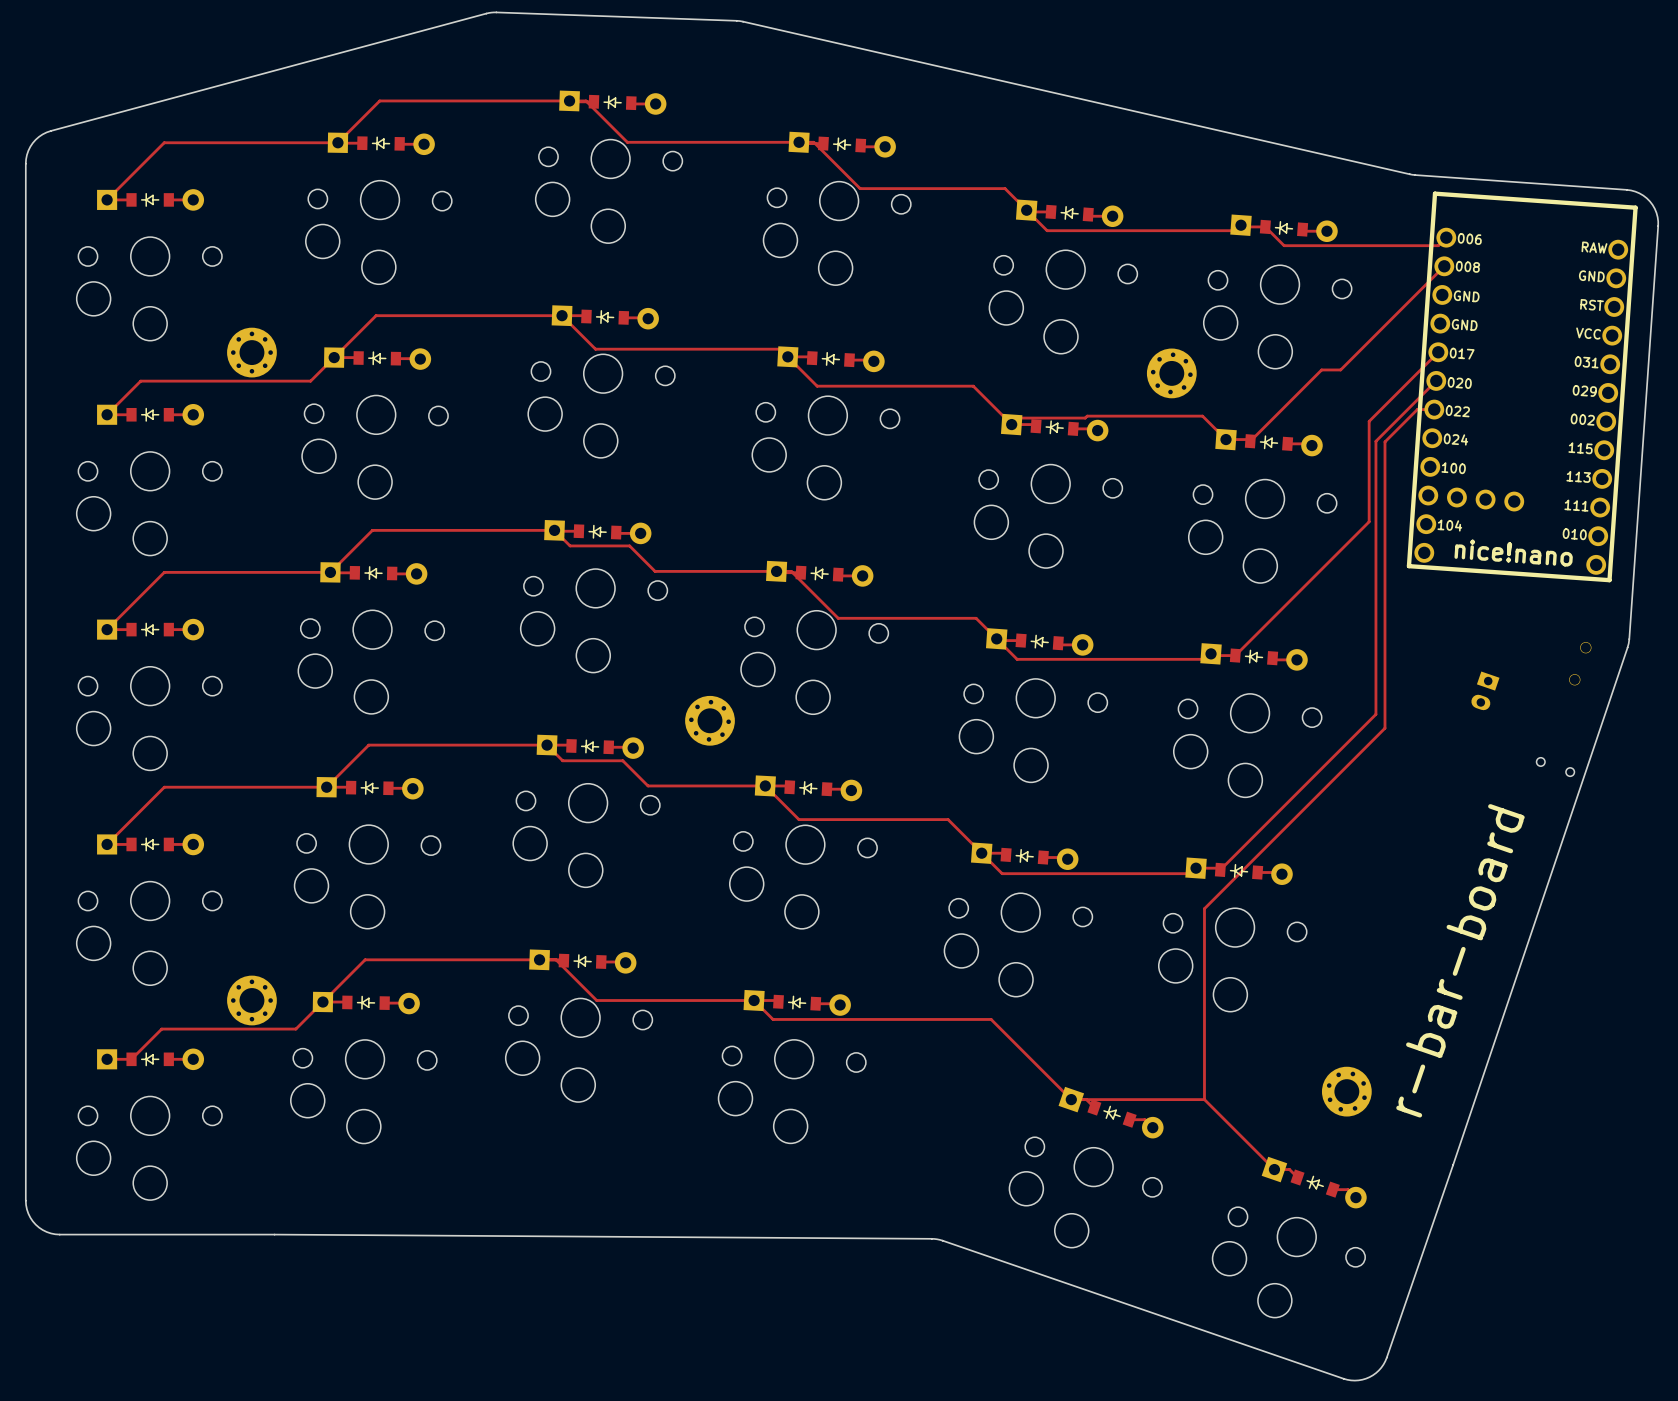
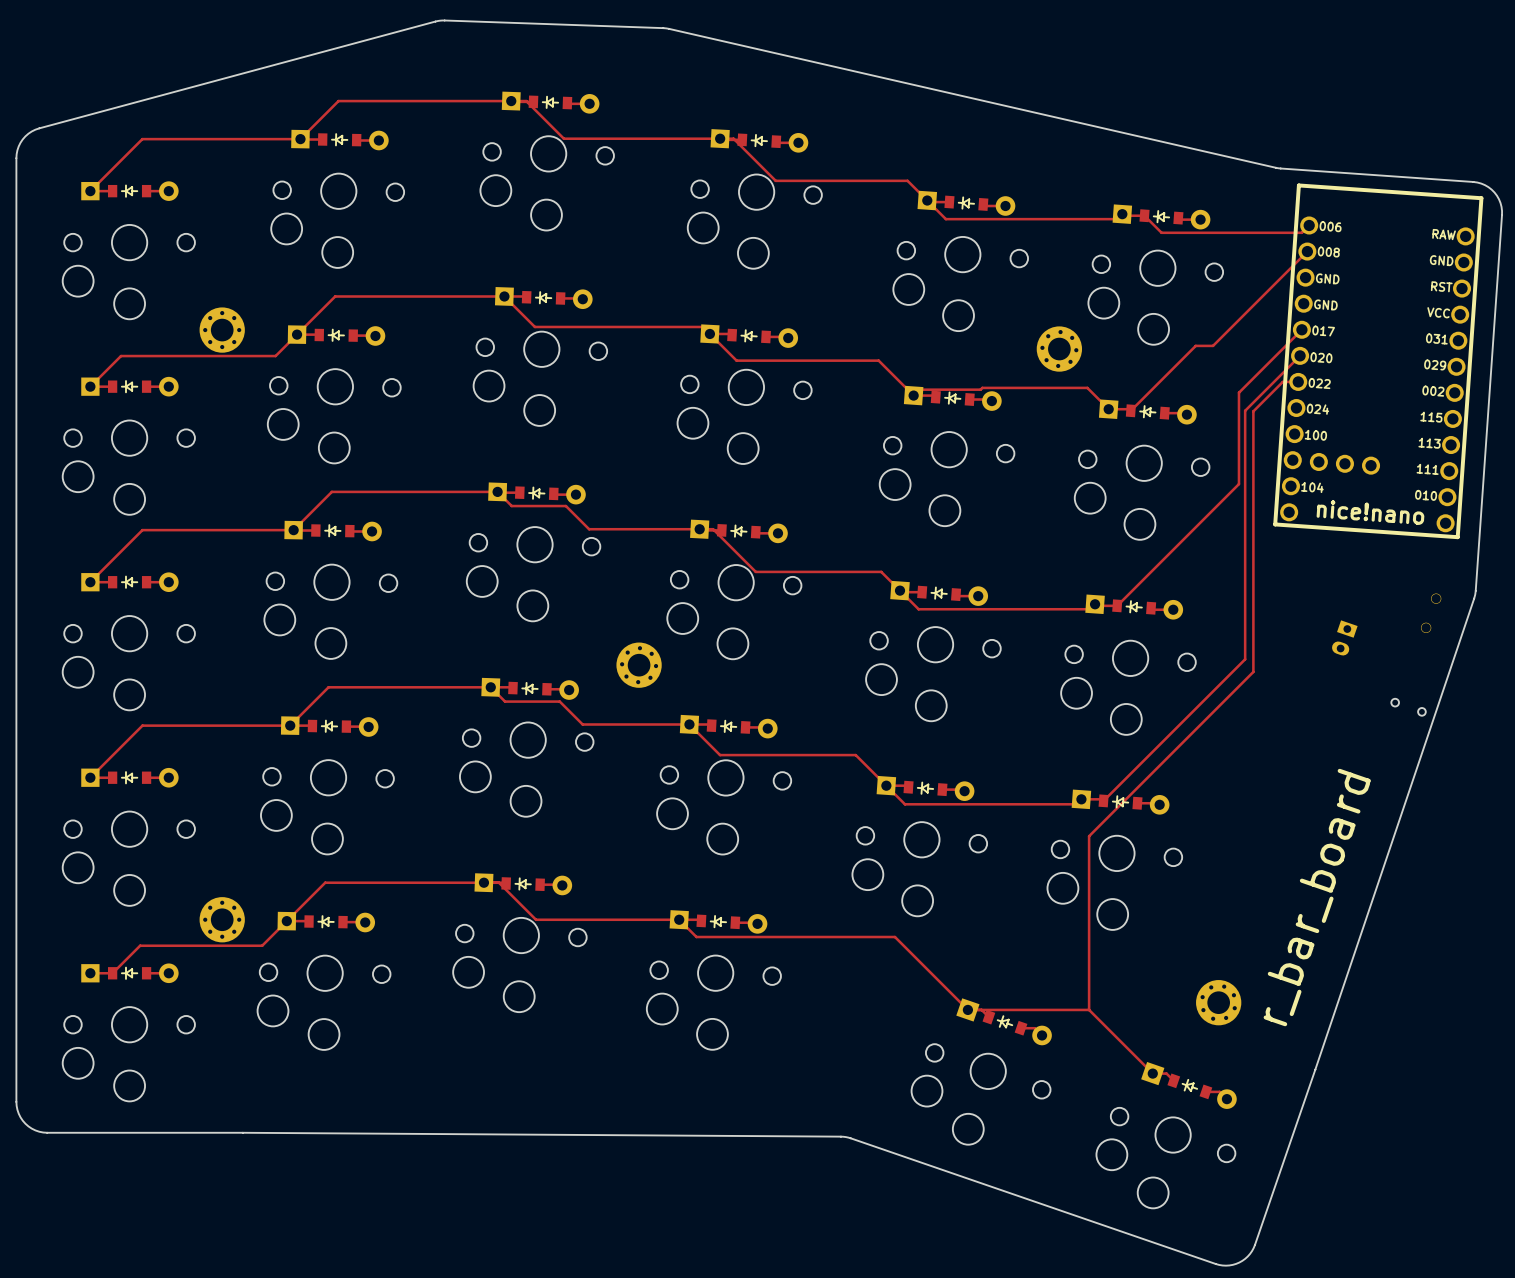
text: r-bar-board (1460, 960) -> r_bar_board (1317, 897)

